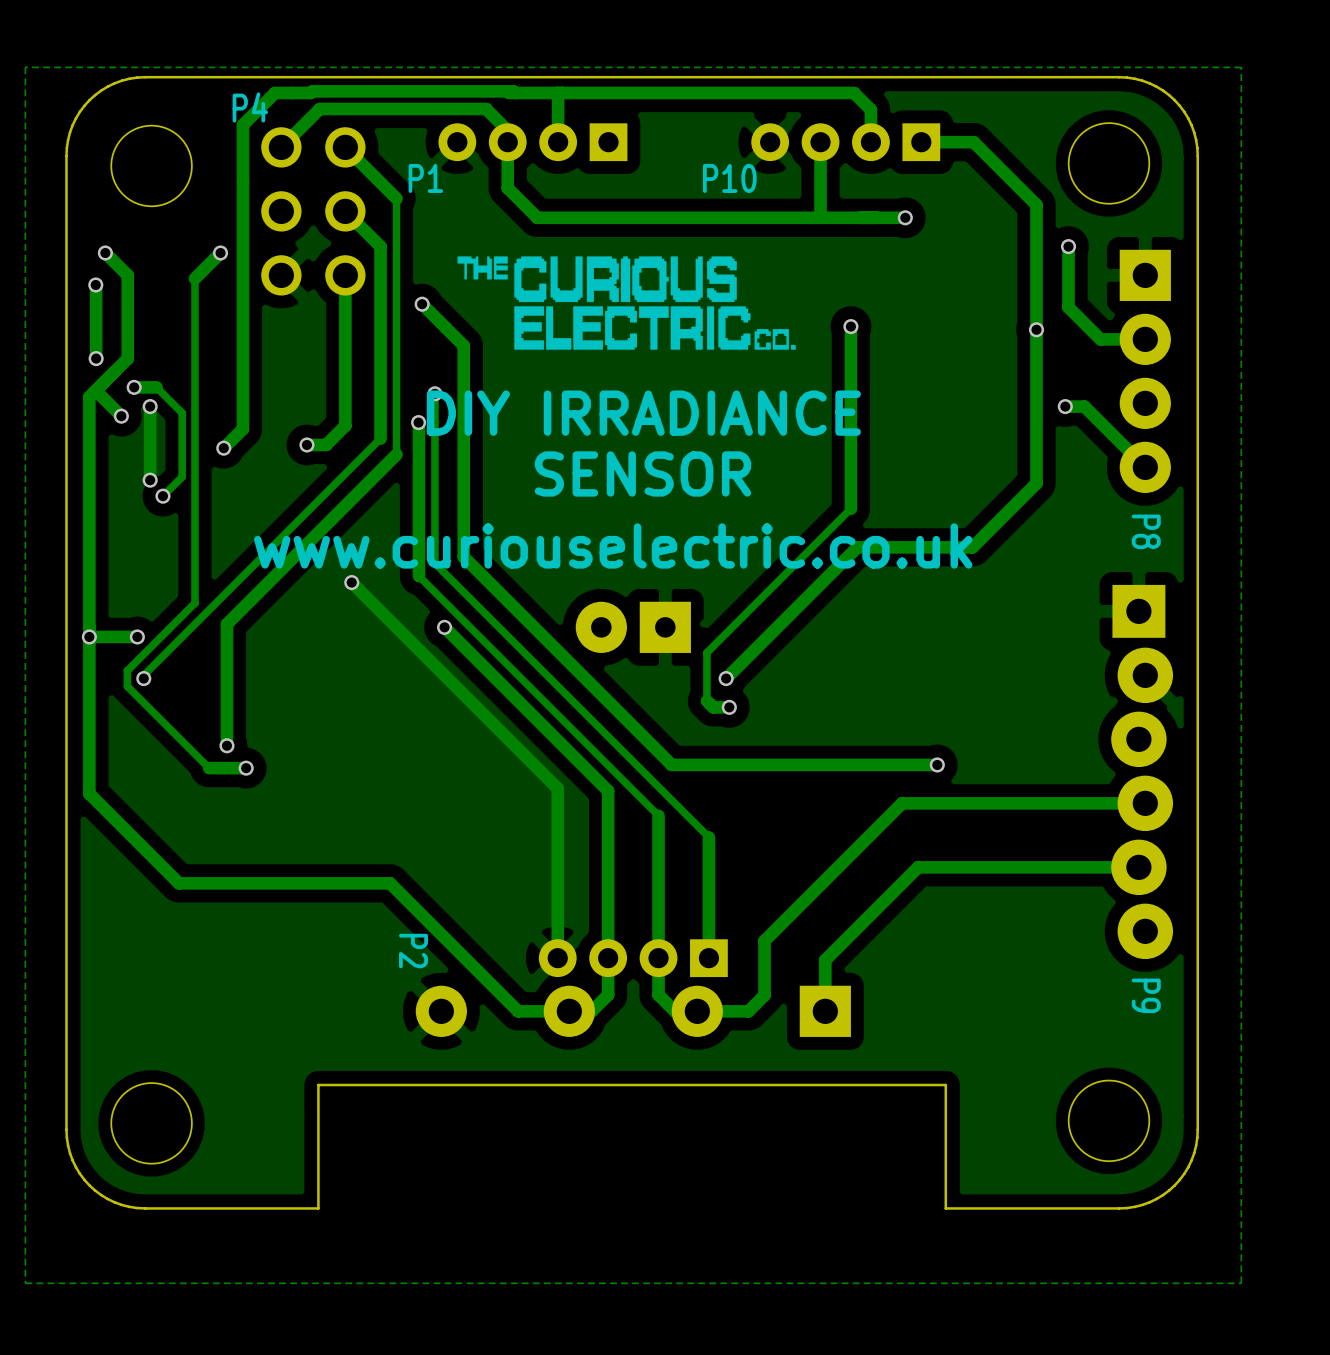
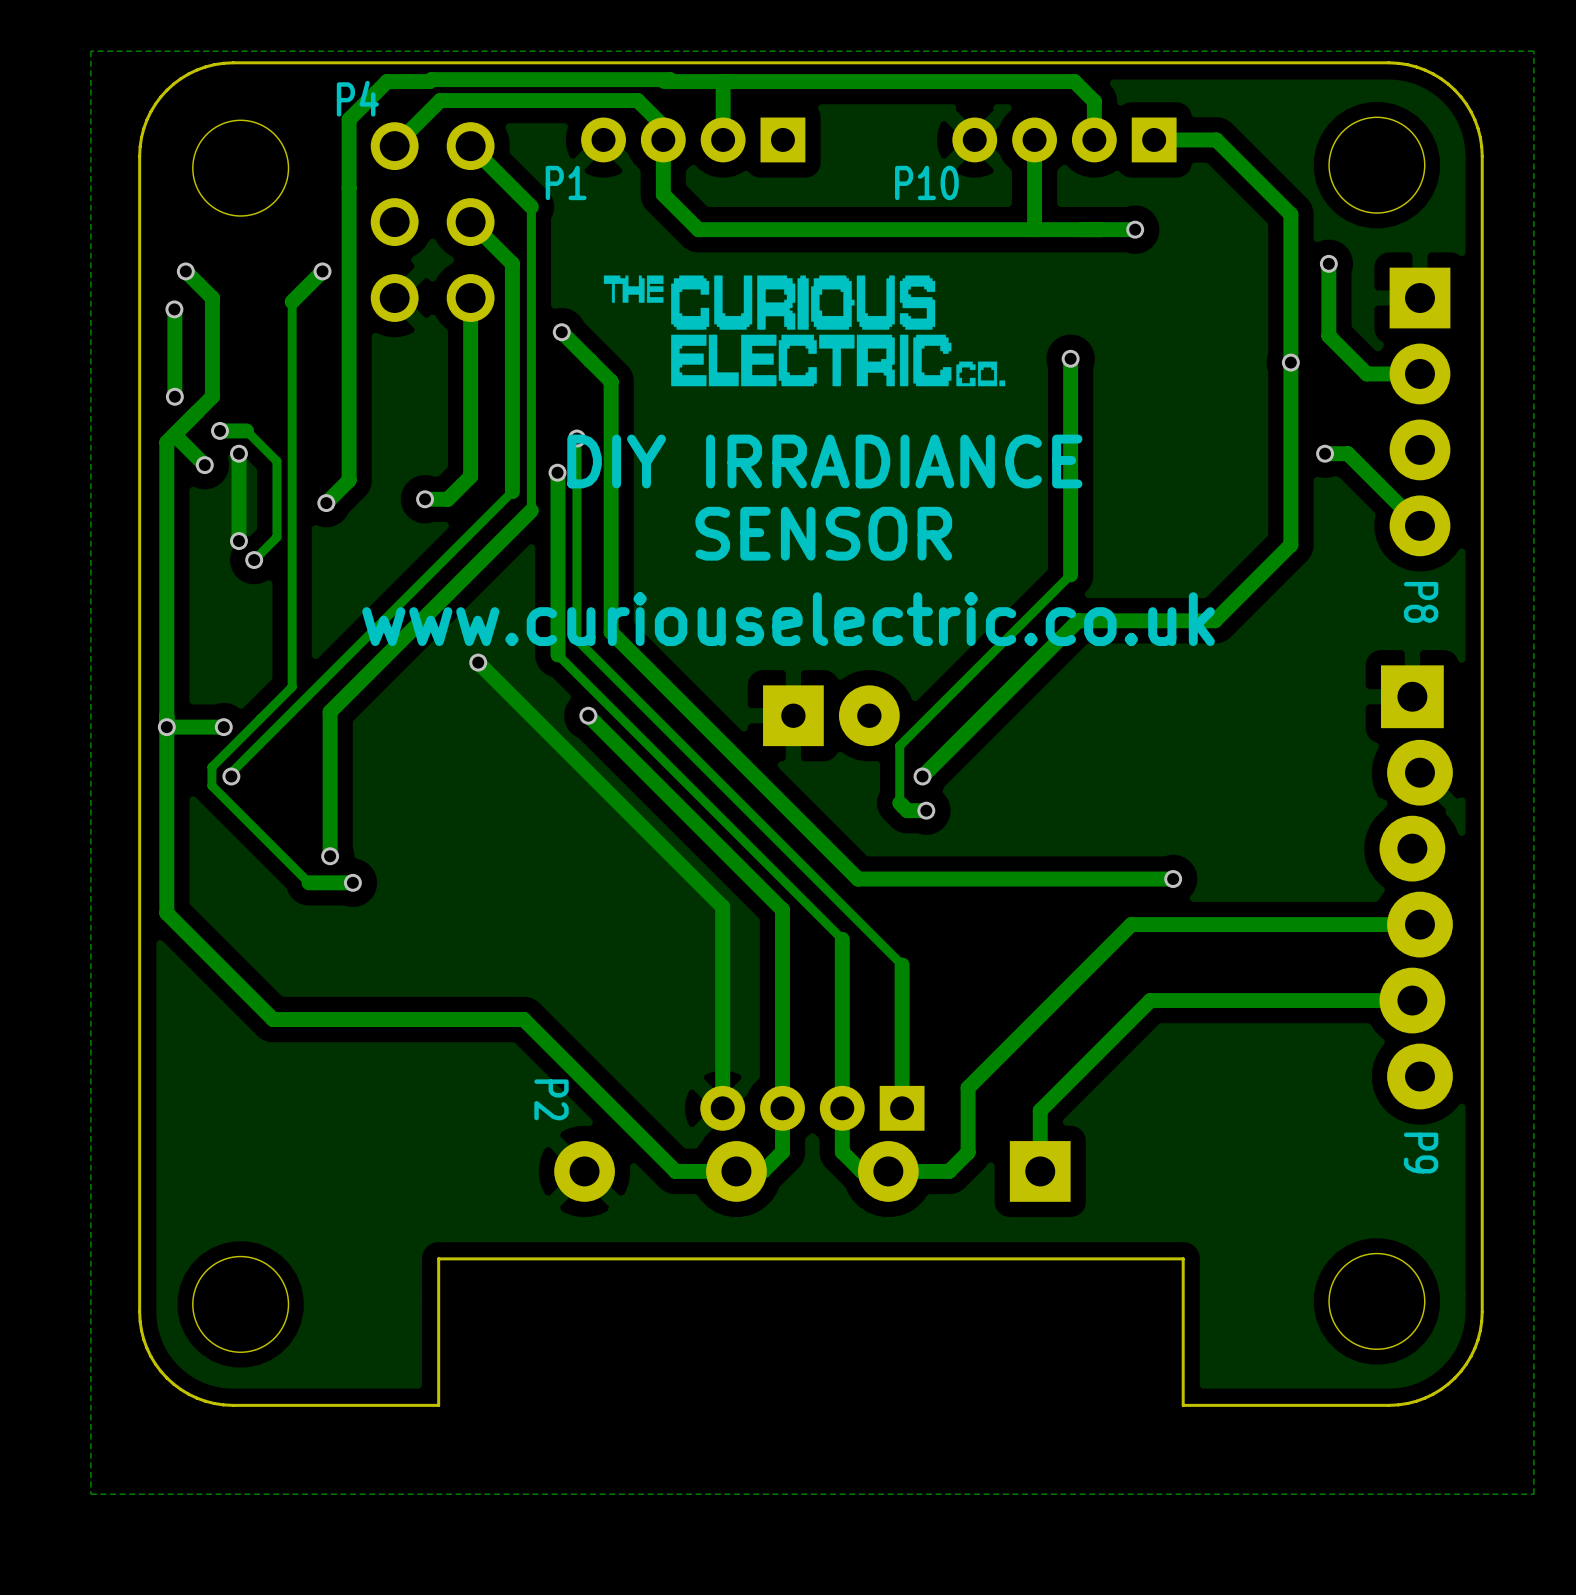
part rotation: 0° (633, 627) -> 180° (831, 715)

